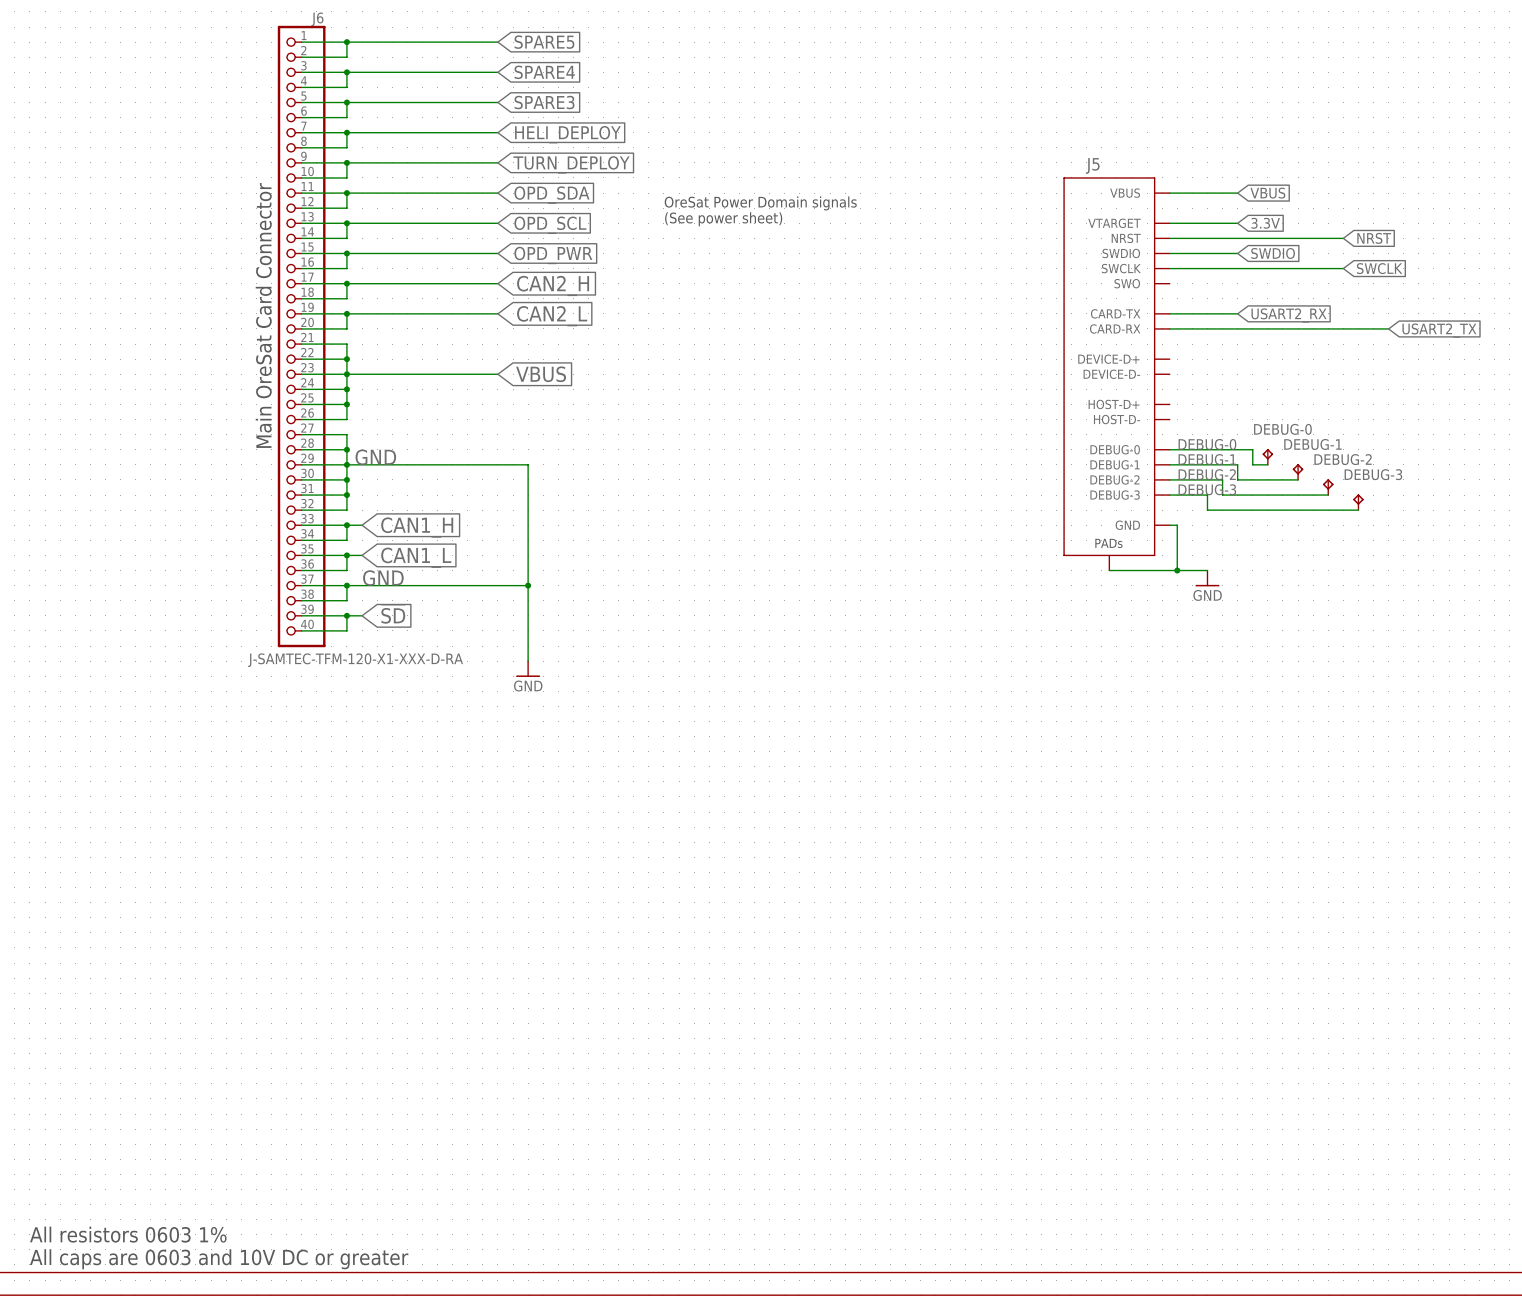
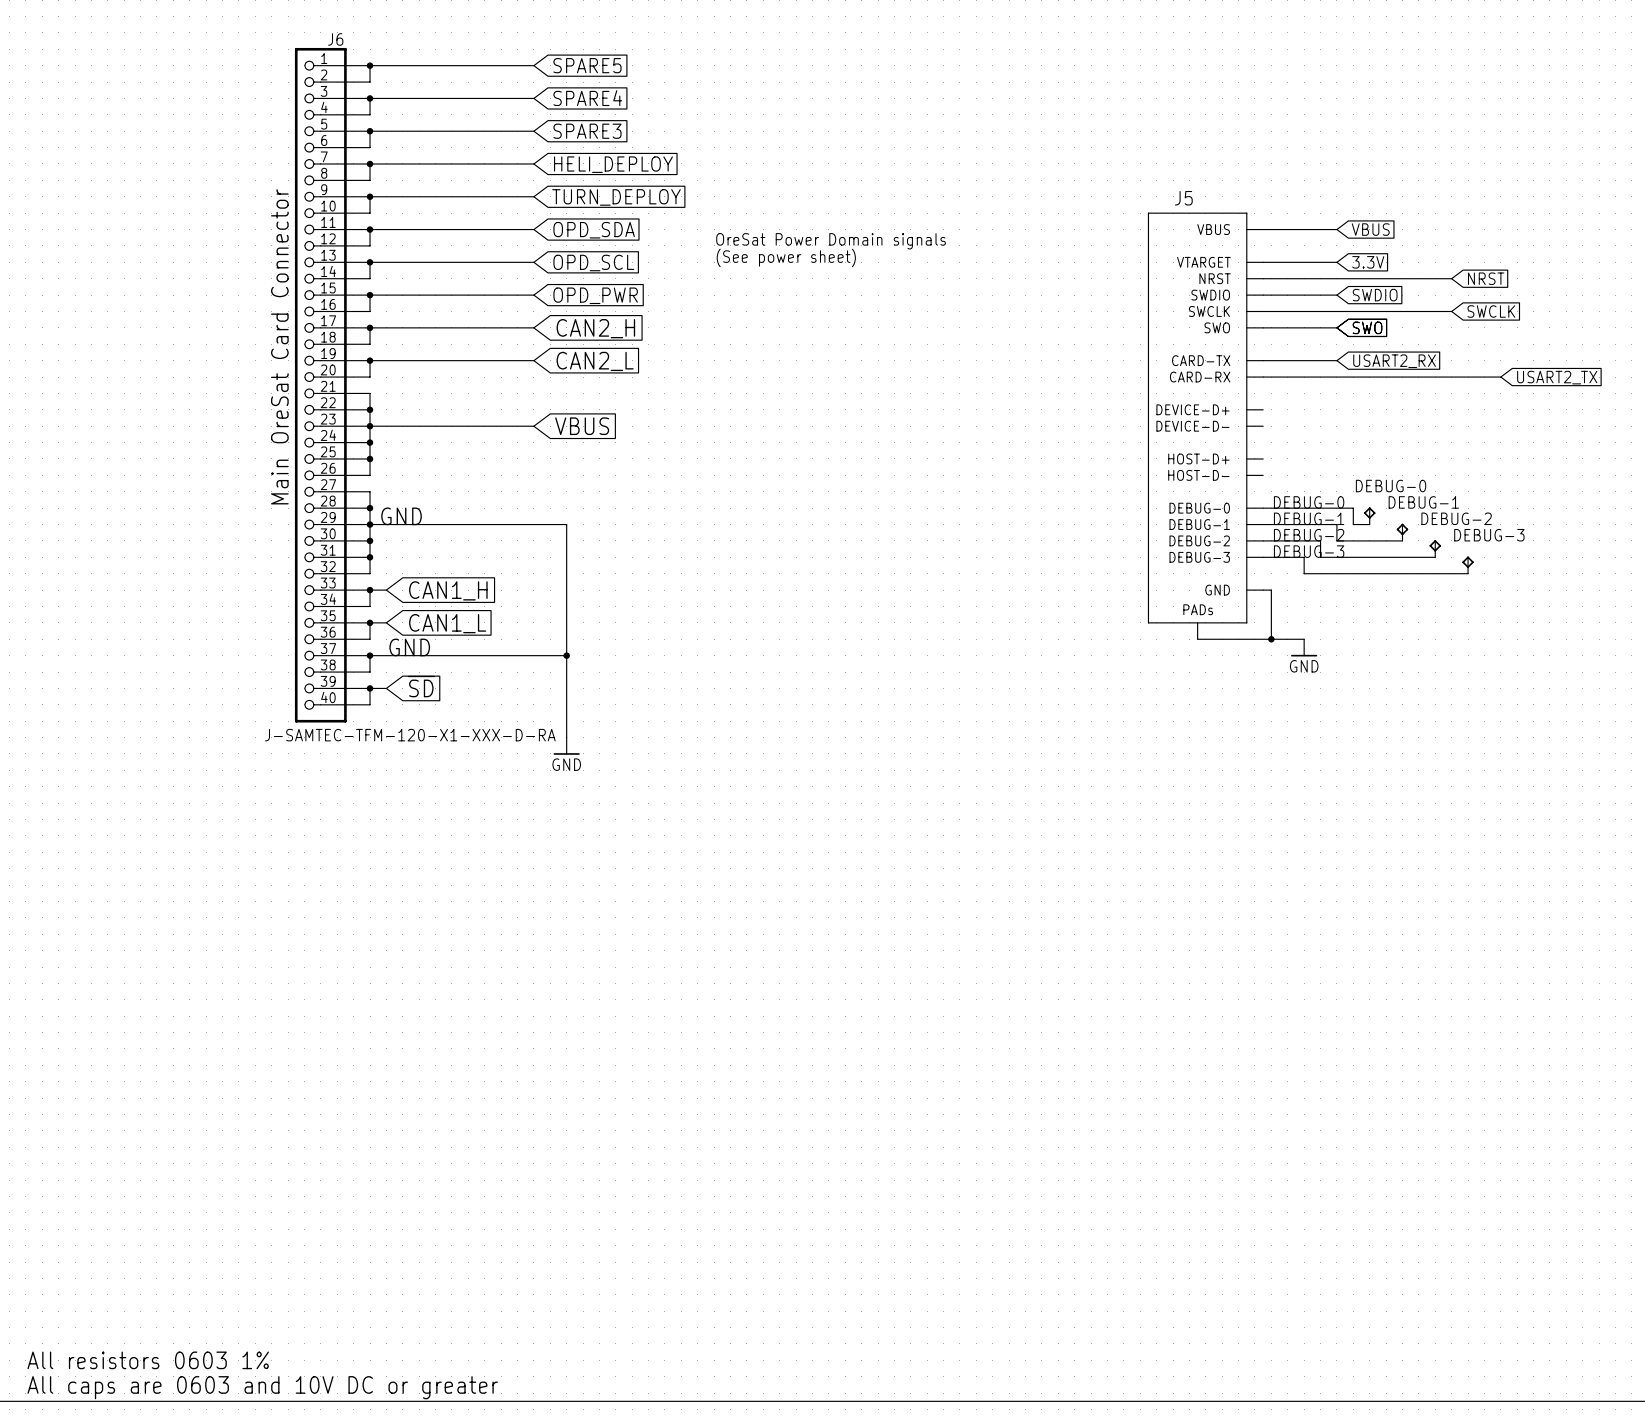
wire: none -> (1263, 327) (1336, 327)
global label: none -> SWO (1367, 327)

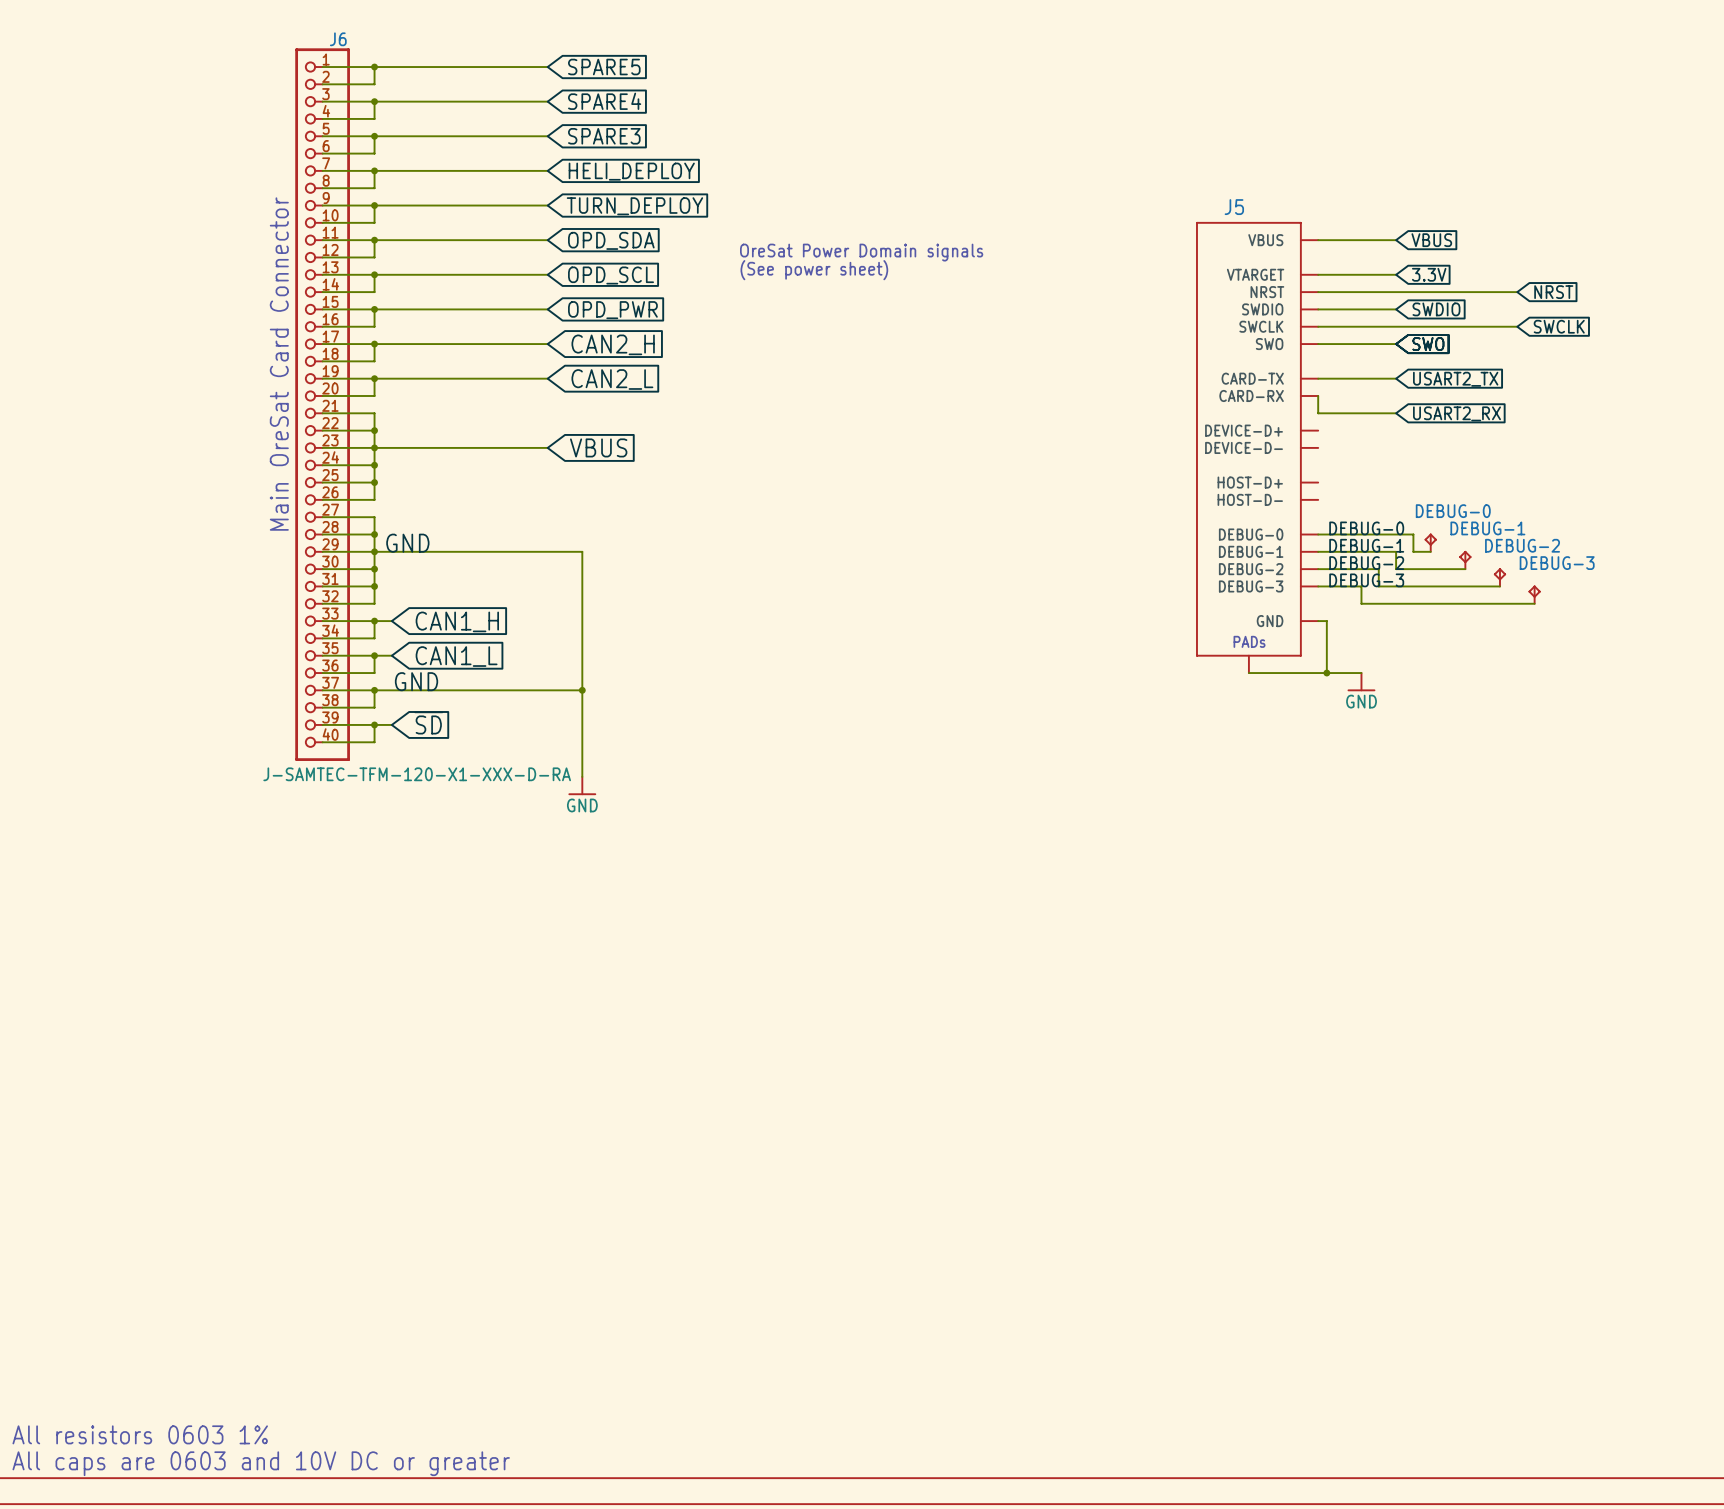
global label: USART2_RX (1394, 361) -> USART2_TX (1455, 379)
wire: (1263, 377) (1500, 377) -> (1318, 395) (1318, 413) (1396, 413)
global label: USART2_TX (1557, 377) -> none
global label: none -> USART2_RX (1456, 413)

